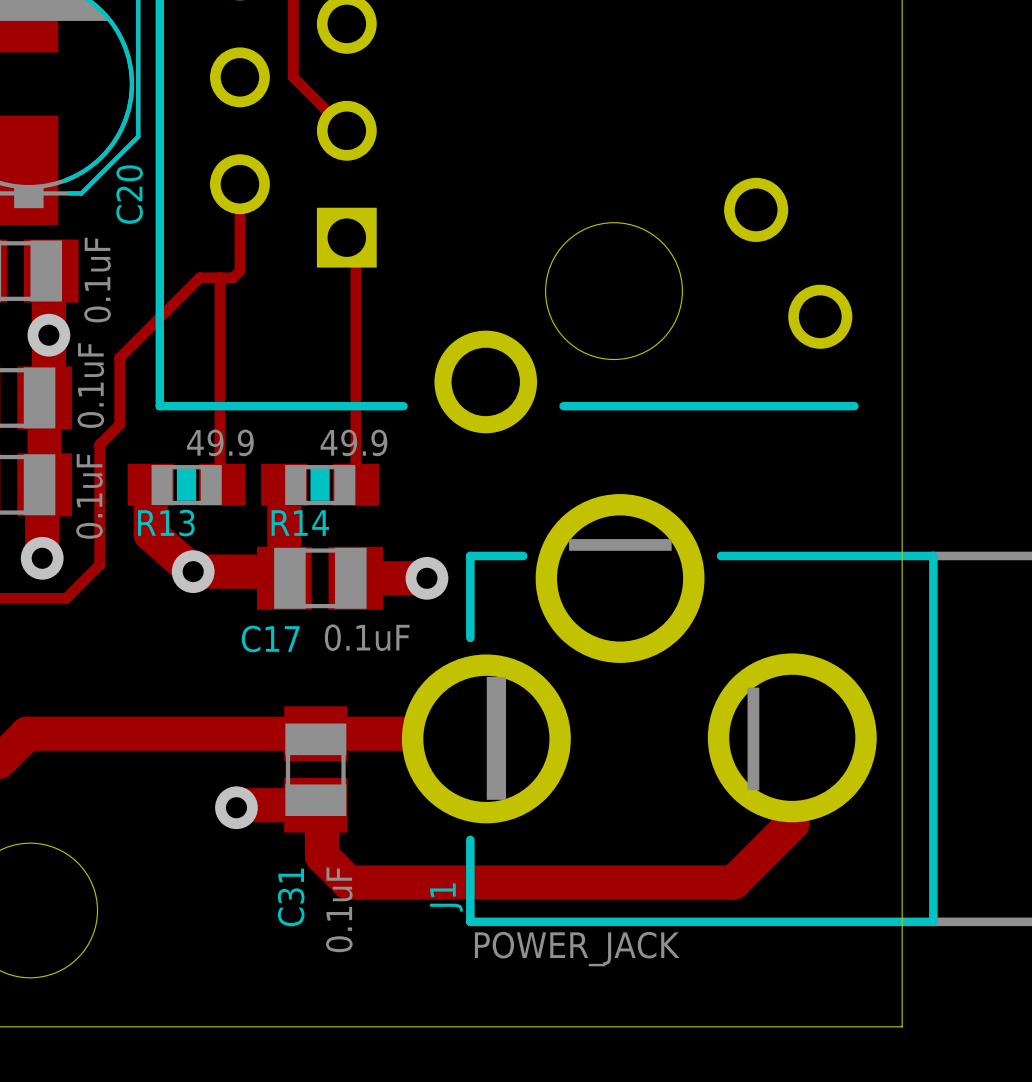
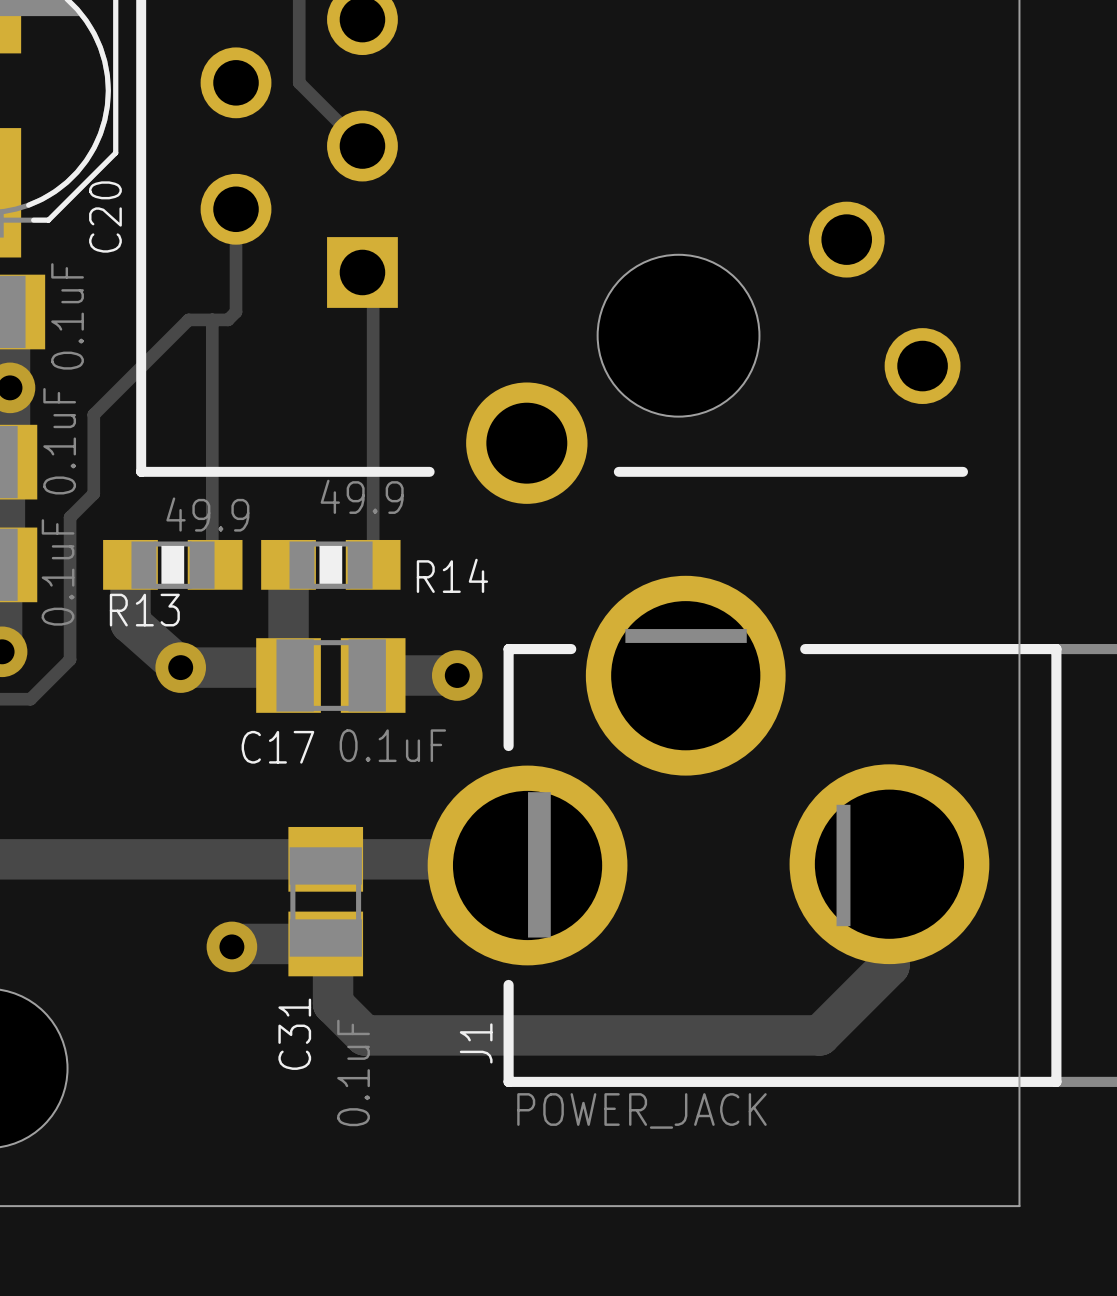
R14 value position: 49.9 (353, 442) -> 49.9 (362, 496)
R14 name position: R14 (300, 523) -> R14 (452, 575)
C31 name position: C31 (291, 897) -> C31 (294, 1034)

